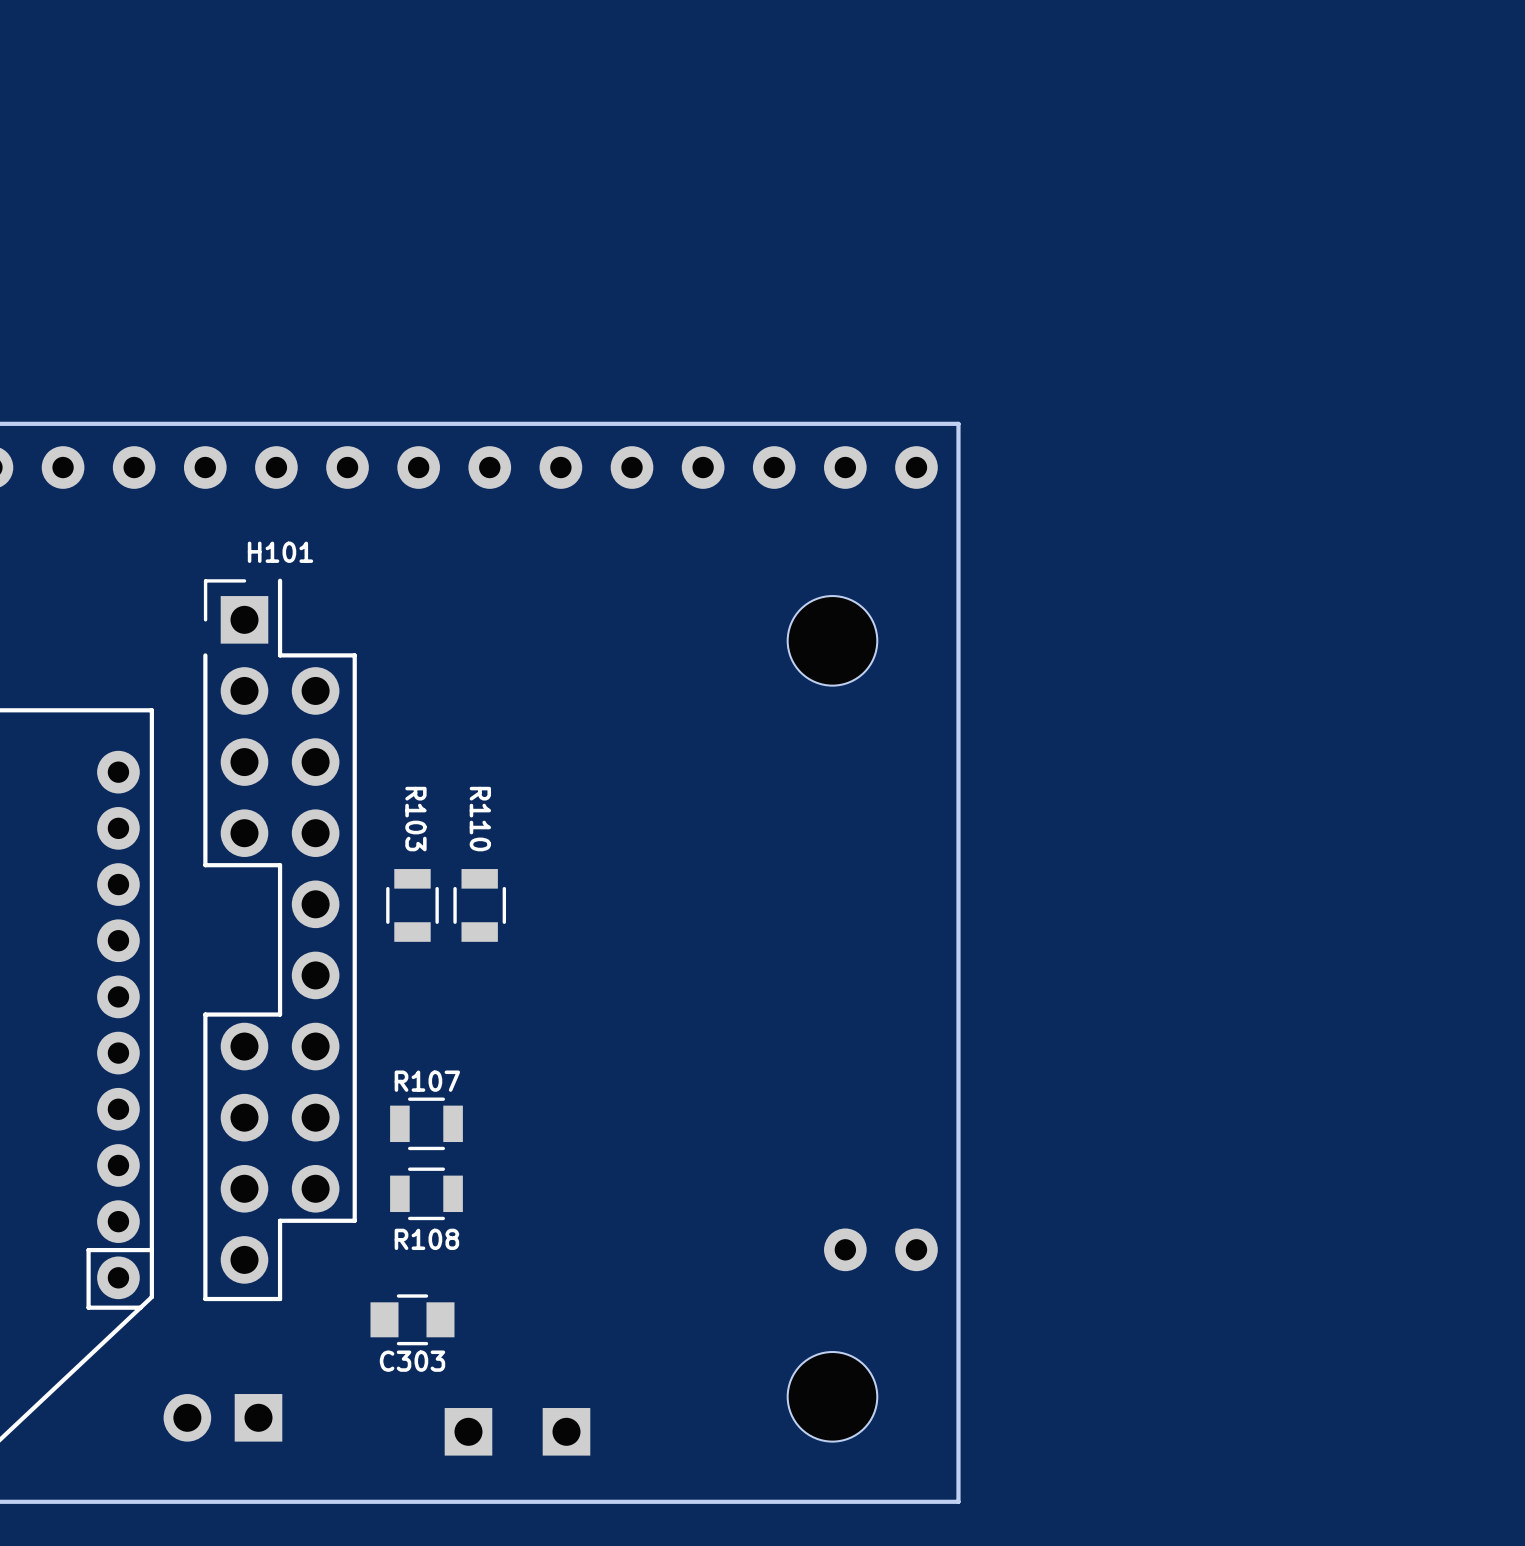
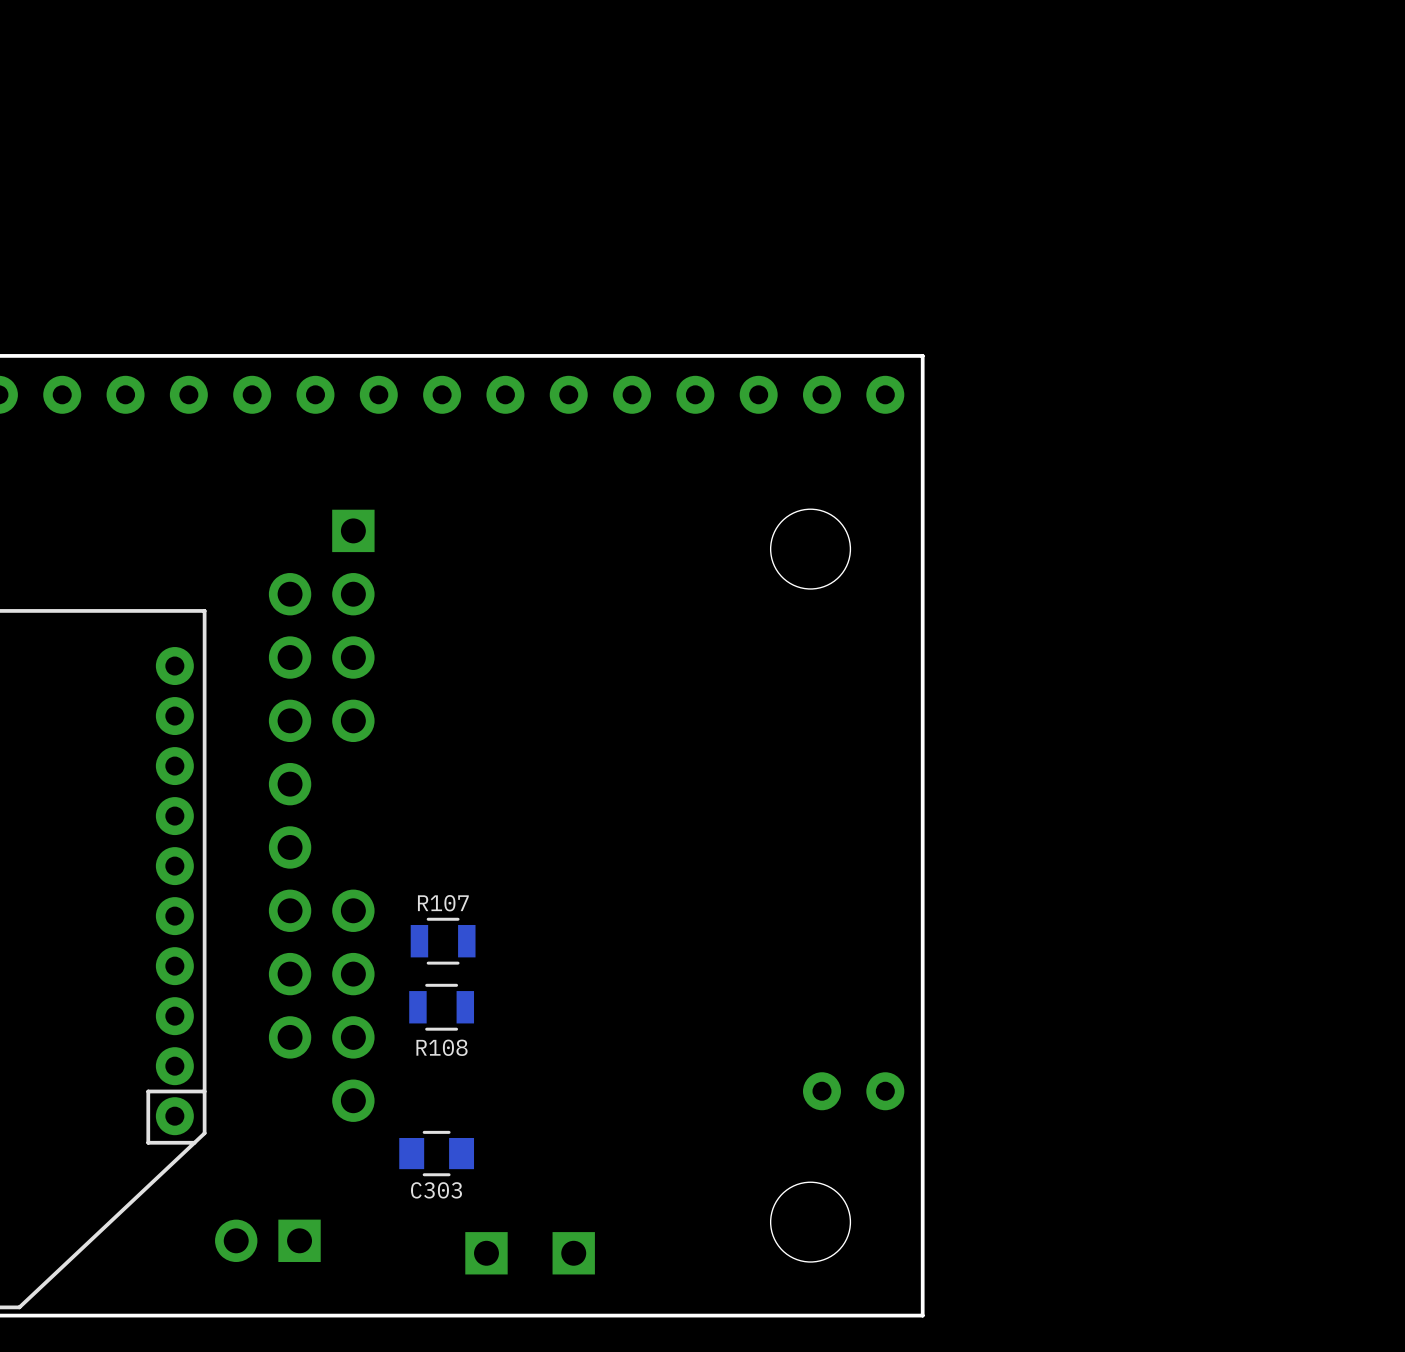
R103: (412, 905) -> none
R110: (479, 905) -> none
H101 side: bottom (280, 939) -> top (321, 815)
R107 position: (426, 1123) -> (443, 941)
R108 position: (426, 1193) -> (441, 1007)

